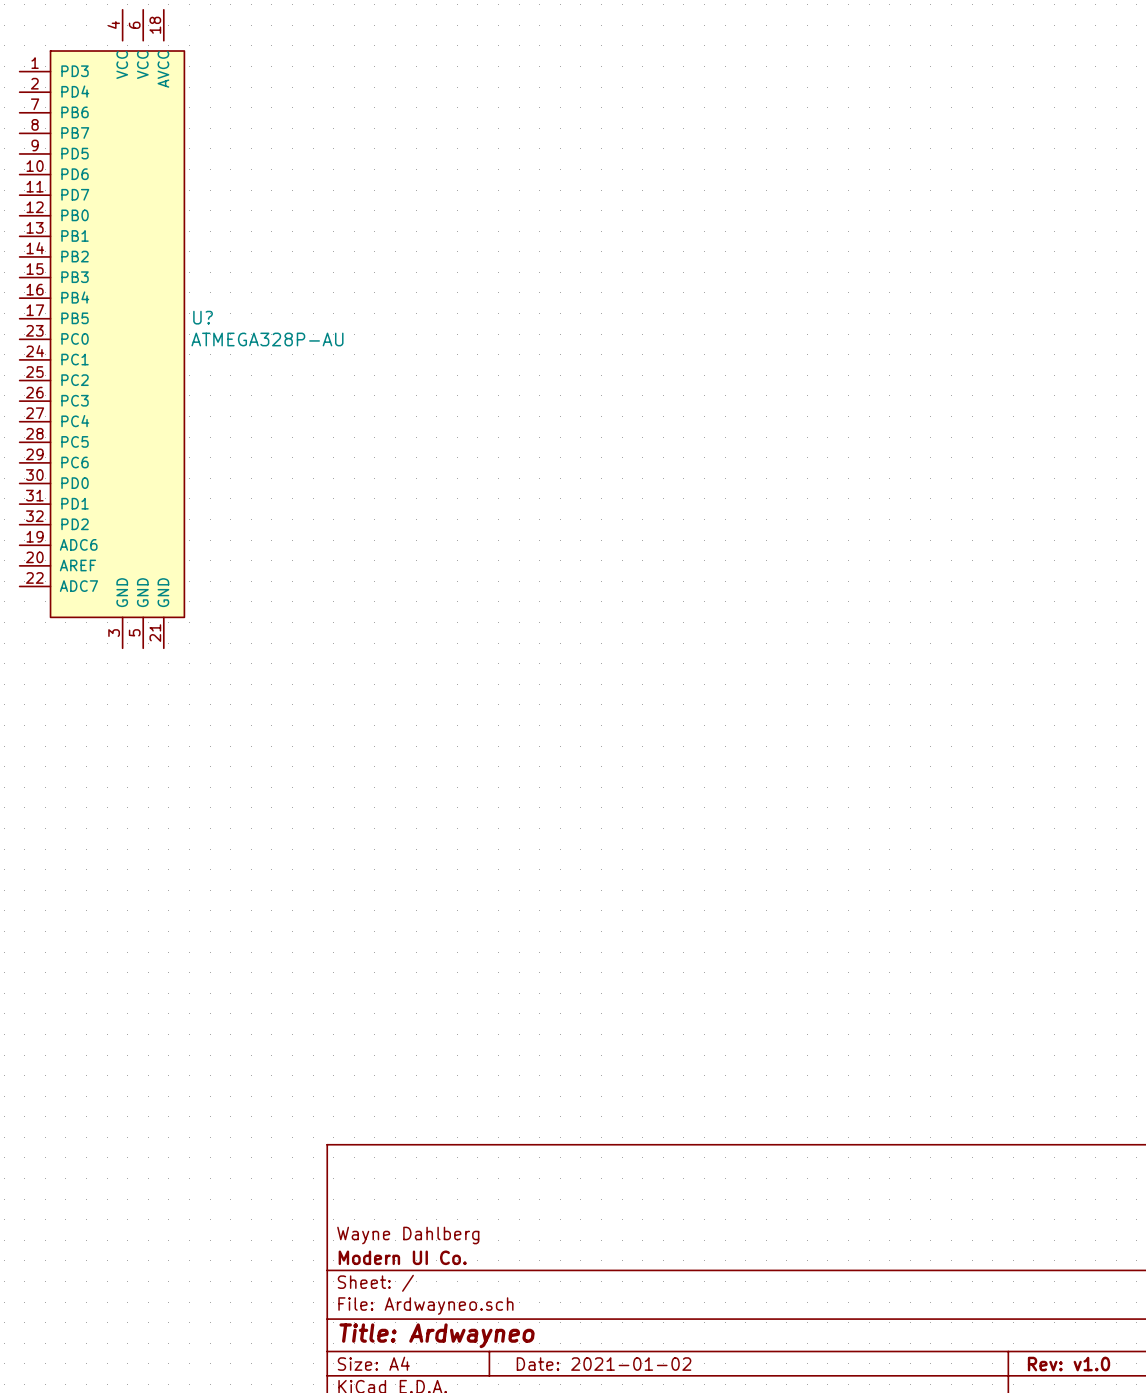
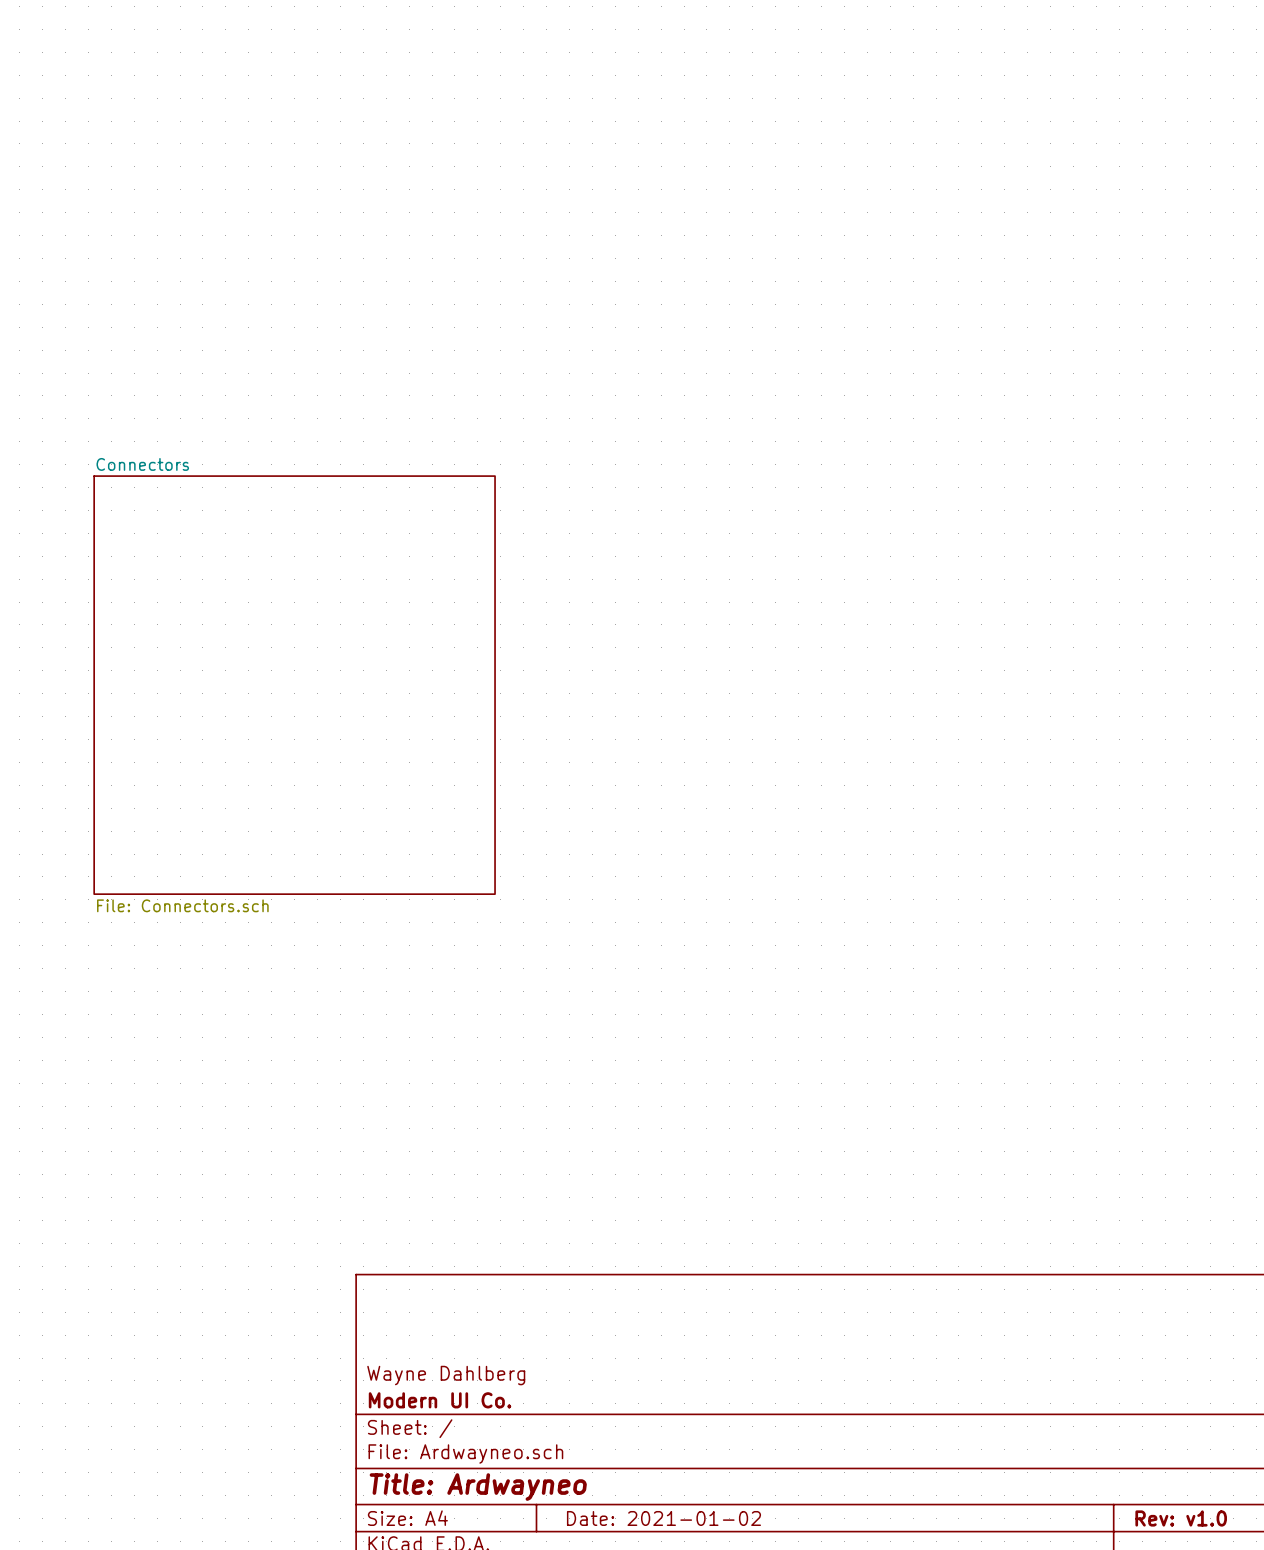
U?: ATMEGA328P-AU (102, 329) -> none
sheet Connectors: none -> File: Connectors.sch (294, 685)

